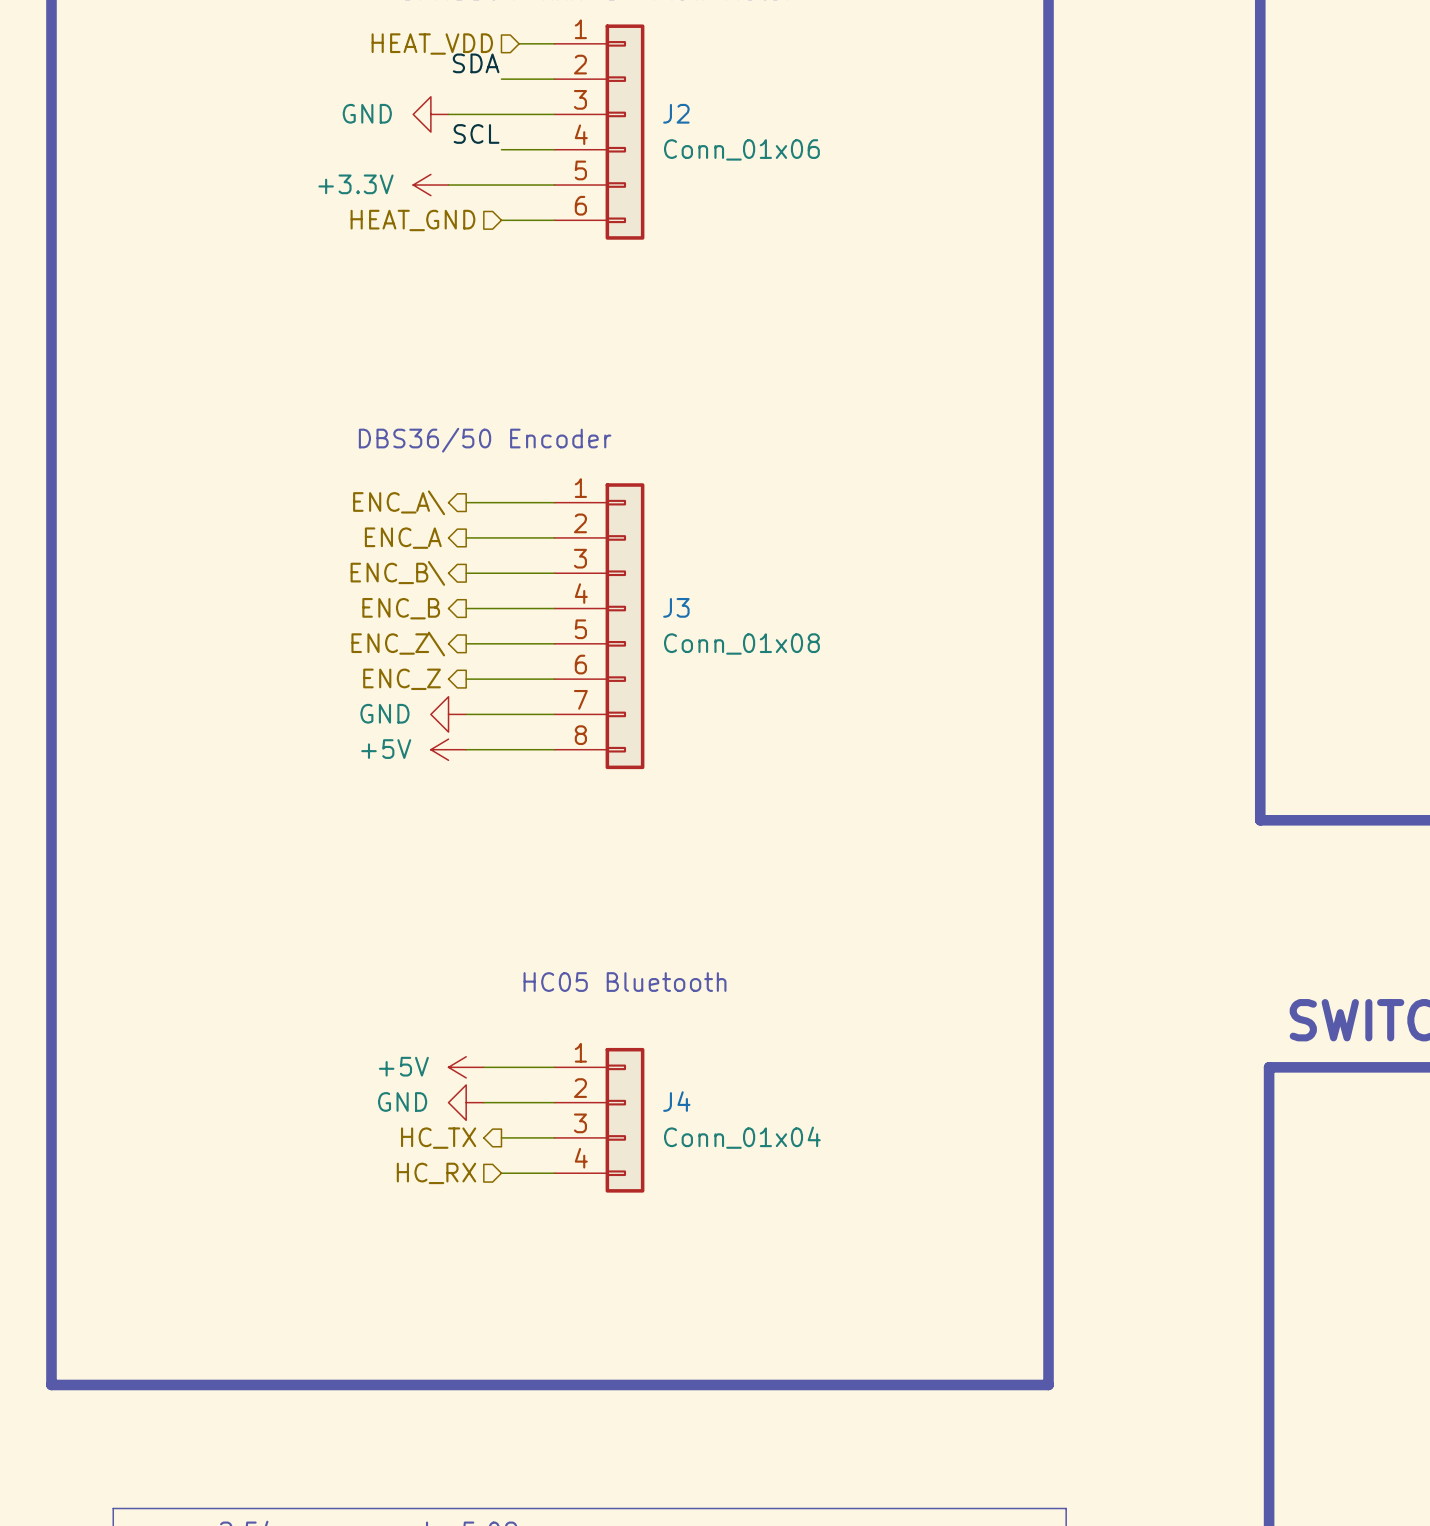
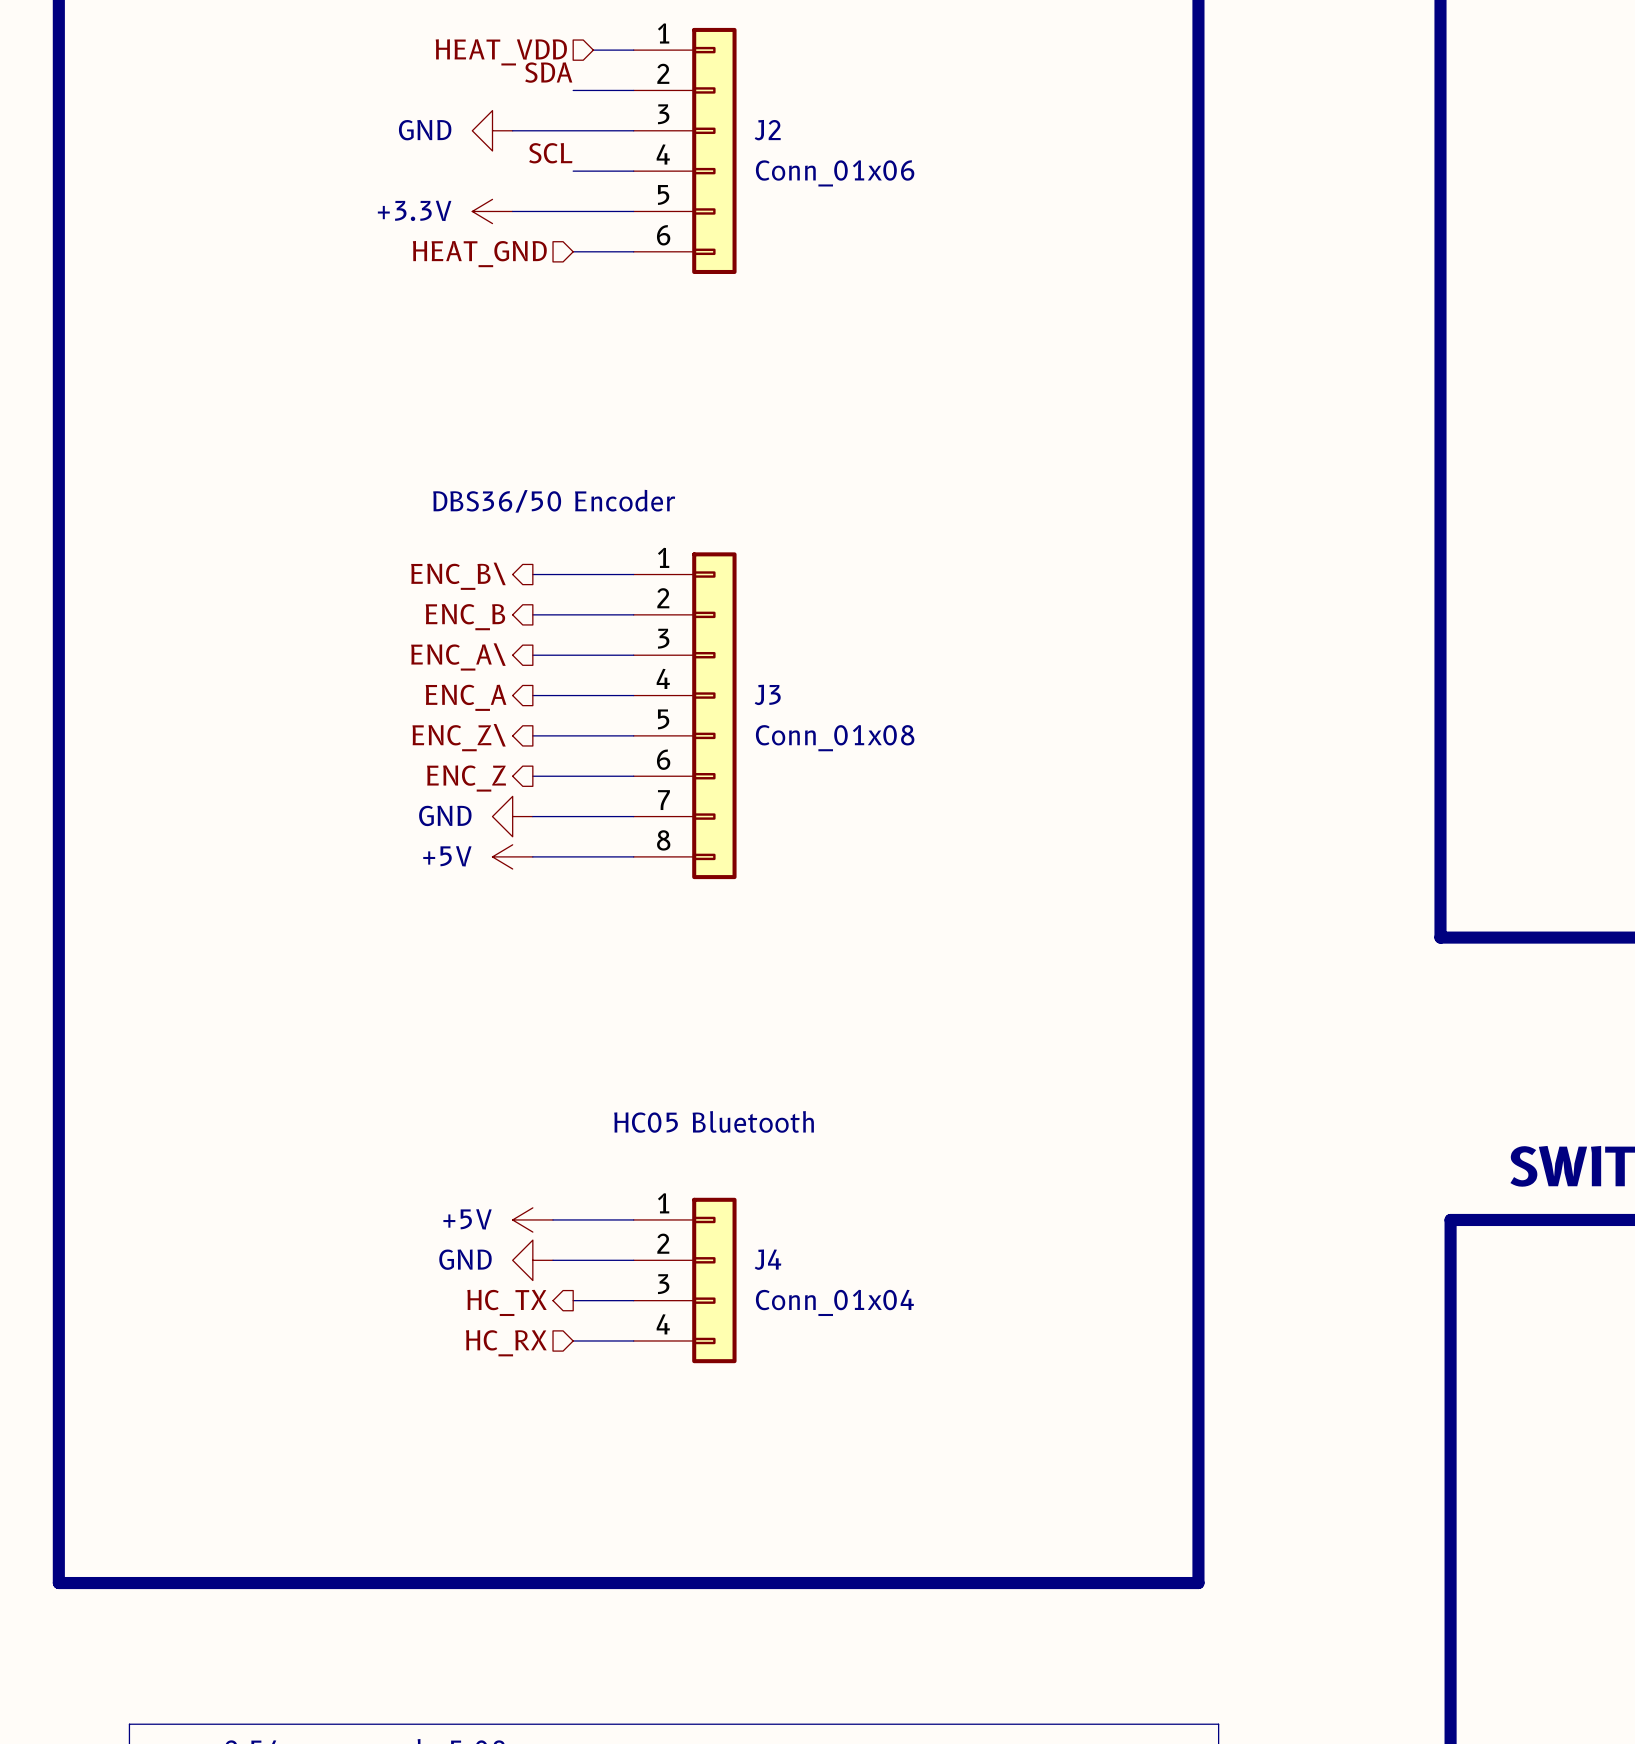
hierarchical label: ENC_A\ (399, 502) -> ENC_B\ (458, 576)
hierarchical label: ENC_A (403, 538) -> ENC_B (465, 617)
hierarchical label: ENC_B\ (397, 573) -> ENC_A\ (458, 656)
hierarchical label: ENC_B (401, 608) -> ENC_A (466, 697)

